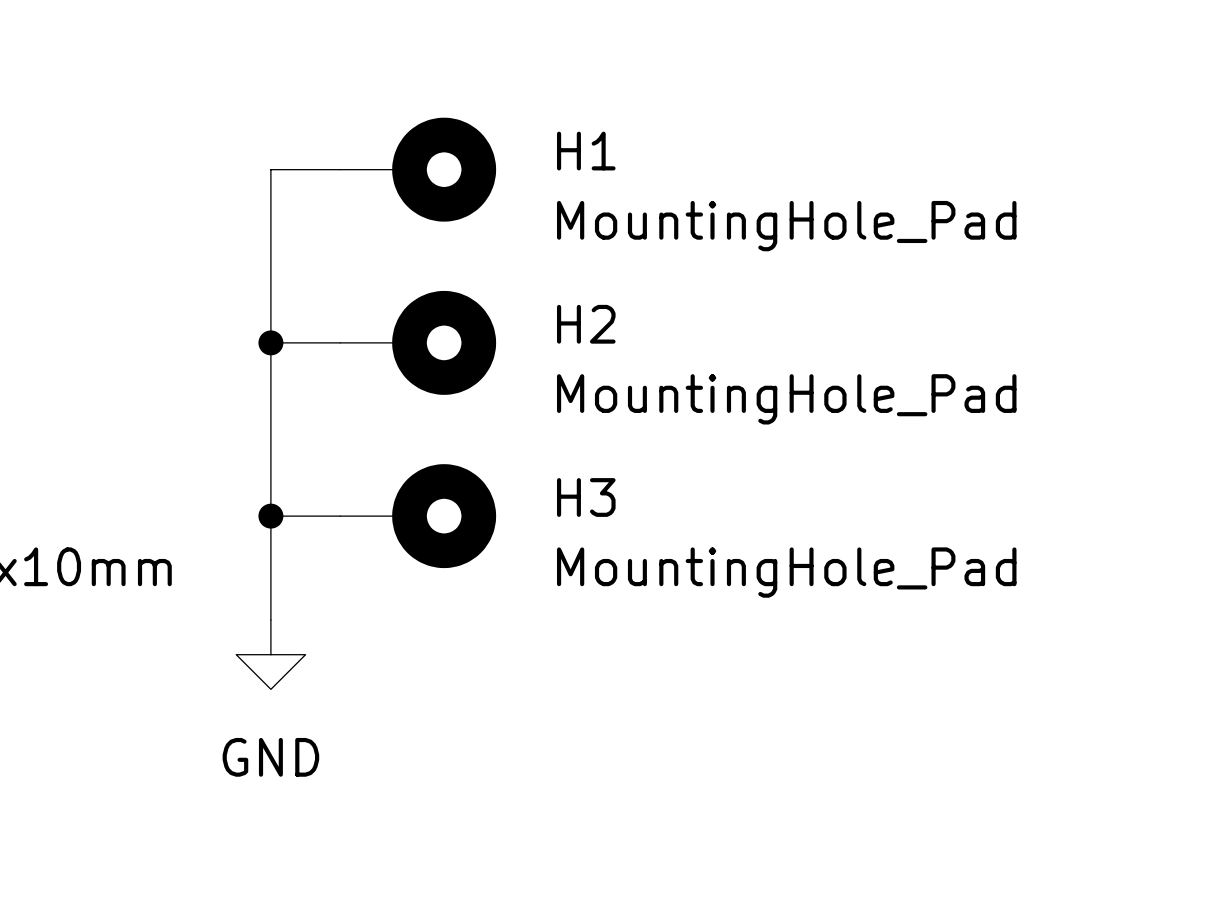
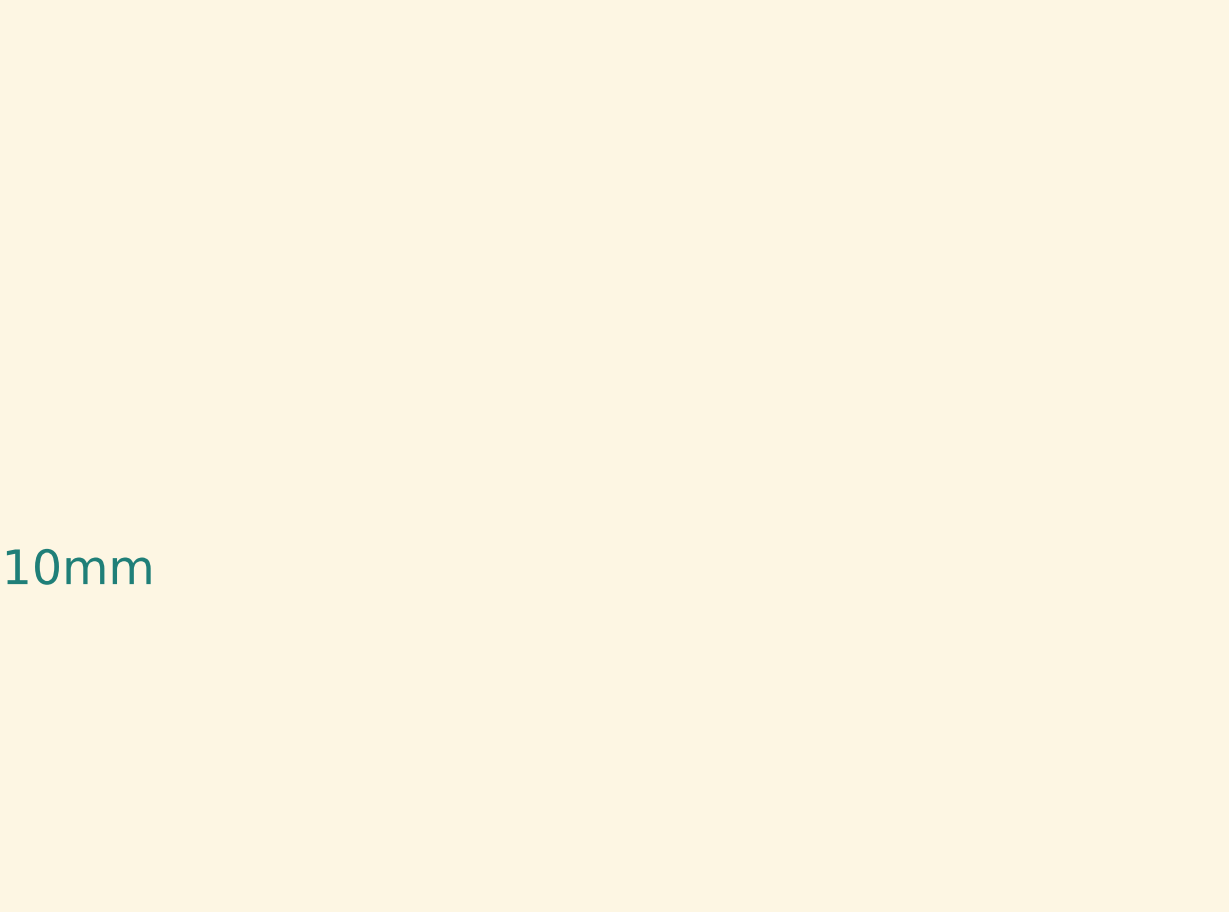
wire: (340, 169) (270, 169) (270, 620) -> none
H1: MountingHole_Pad (418, 169) -> none
wire: (270, 342) (340, 342) -> none
junction: (270, 342) -> none
H2: MountingHole_Pad (418, 342) -> none
wire: (270, 516) (340, 516) -> none
junction: (270, 516) -> none
H3: MountingHole_Pad (418, 516) -> none
power symbol: GND (270, 654) -> none

